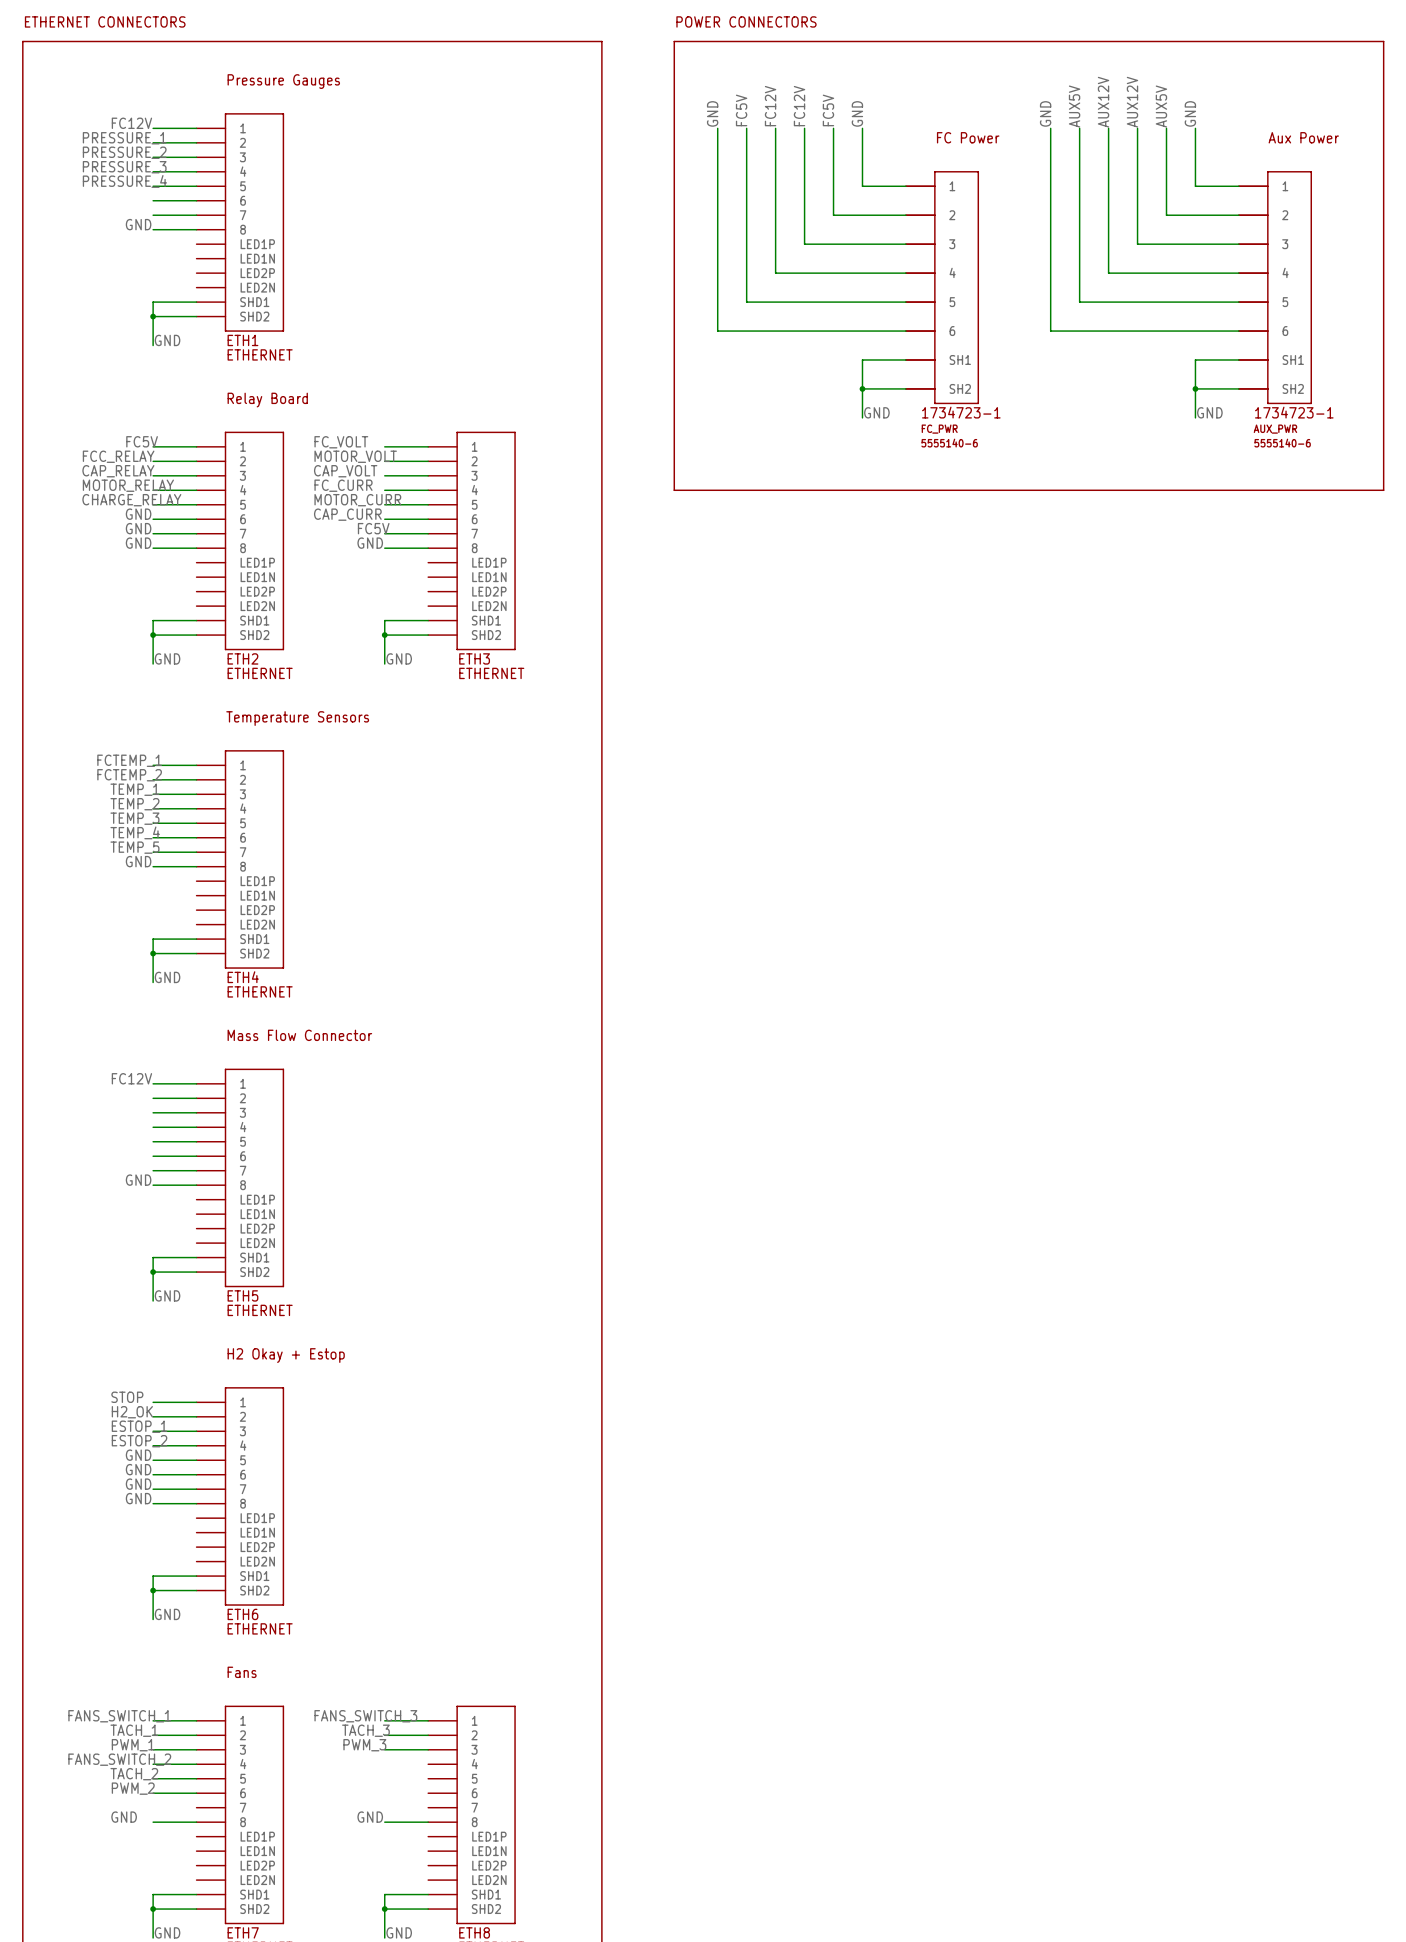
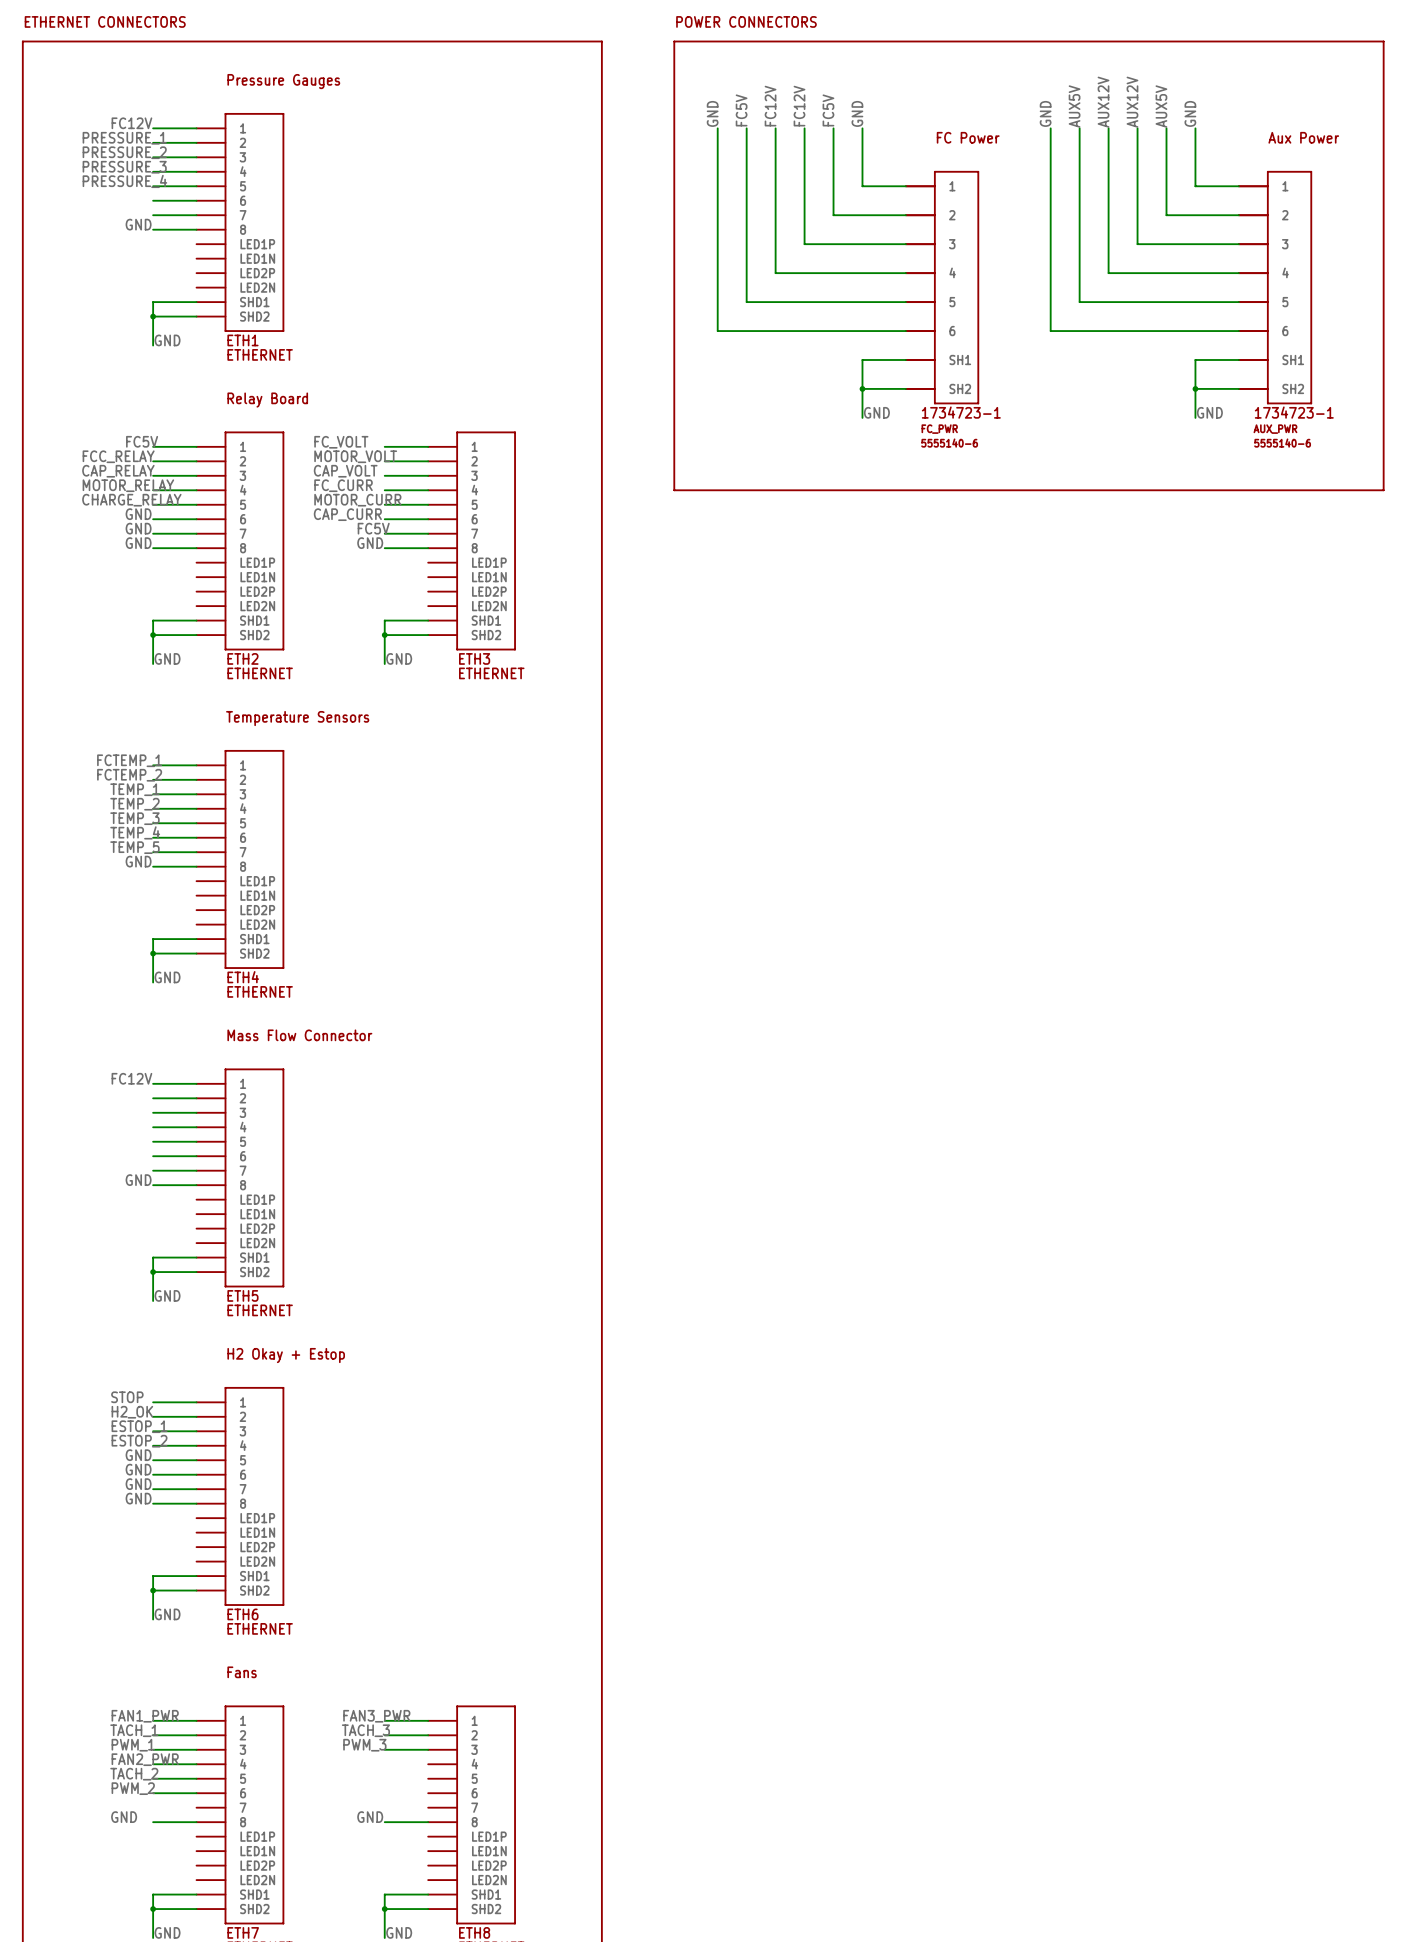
label: FANS_SWITCH_1 (119, 1716) -> none
label: none -> FAN1_PWR (145, 1716)
label: FANS_SWITCH_3 (365, 1716) -> none
label: none -> FAN3_PWR (376, 1716)
label: FANS_SWITCH_2 (119, 1759) -> none
label: none -> FAN2_PWR (145, 1759)

